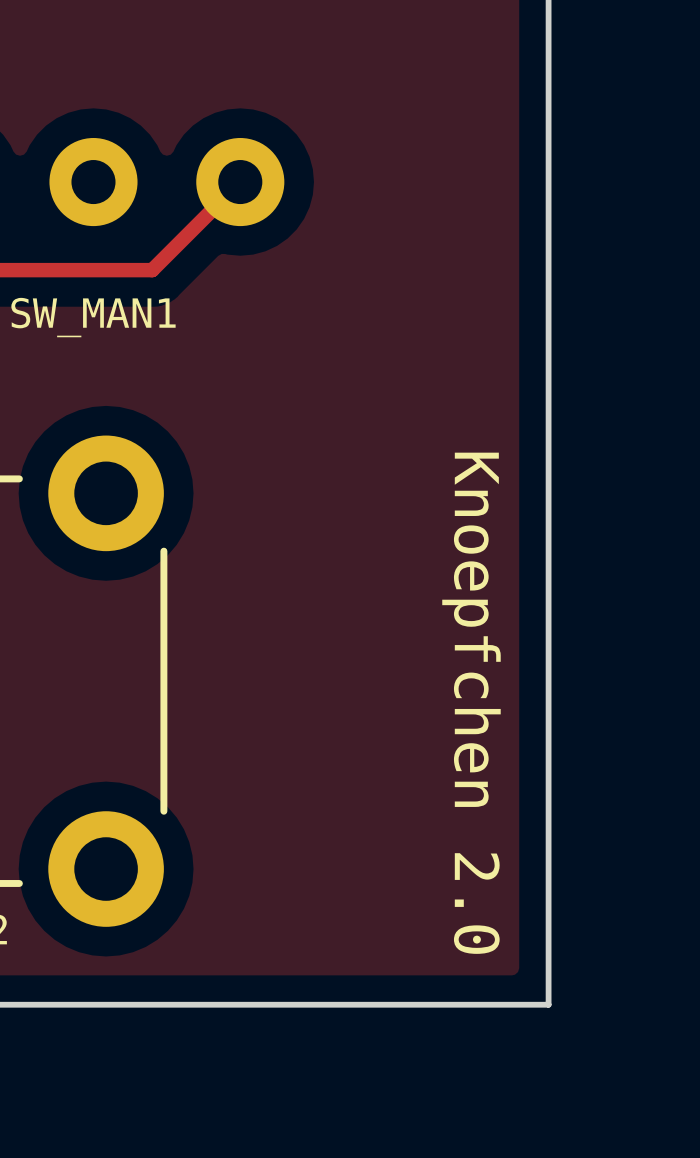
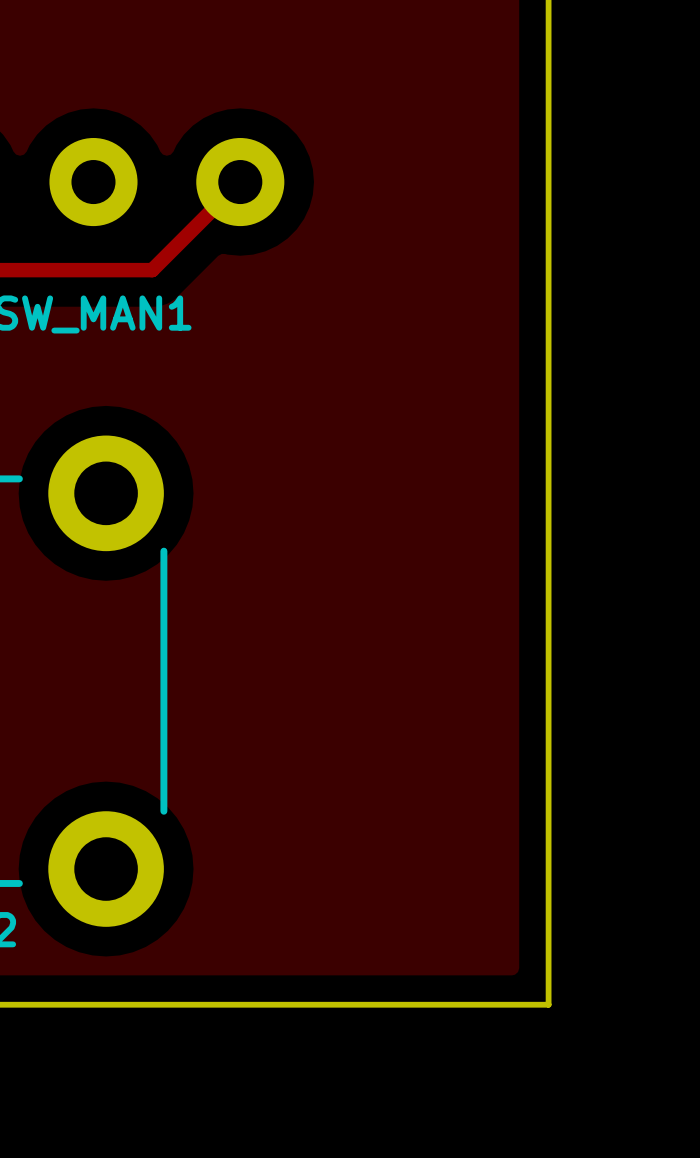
text: Knoepfchen 2.0 (471, 703) -> none

